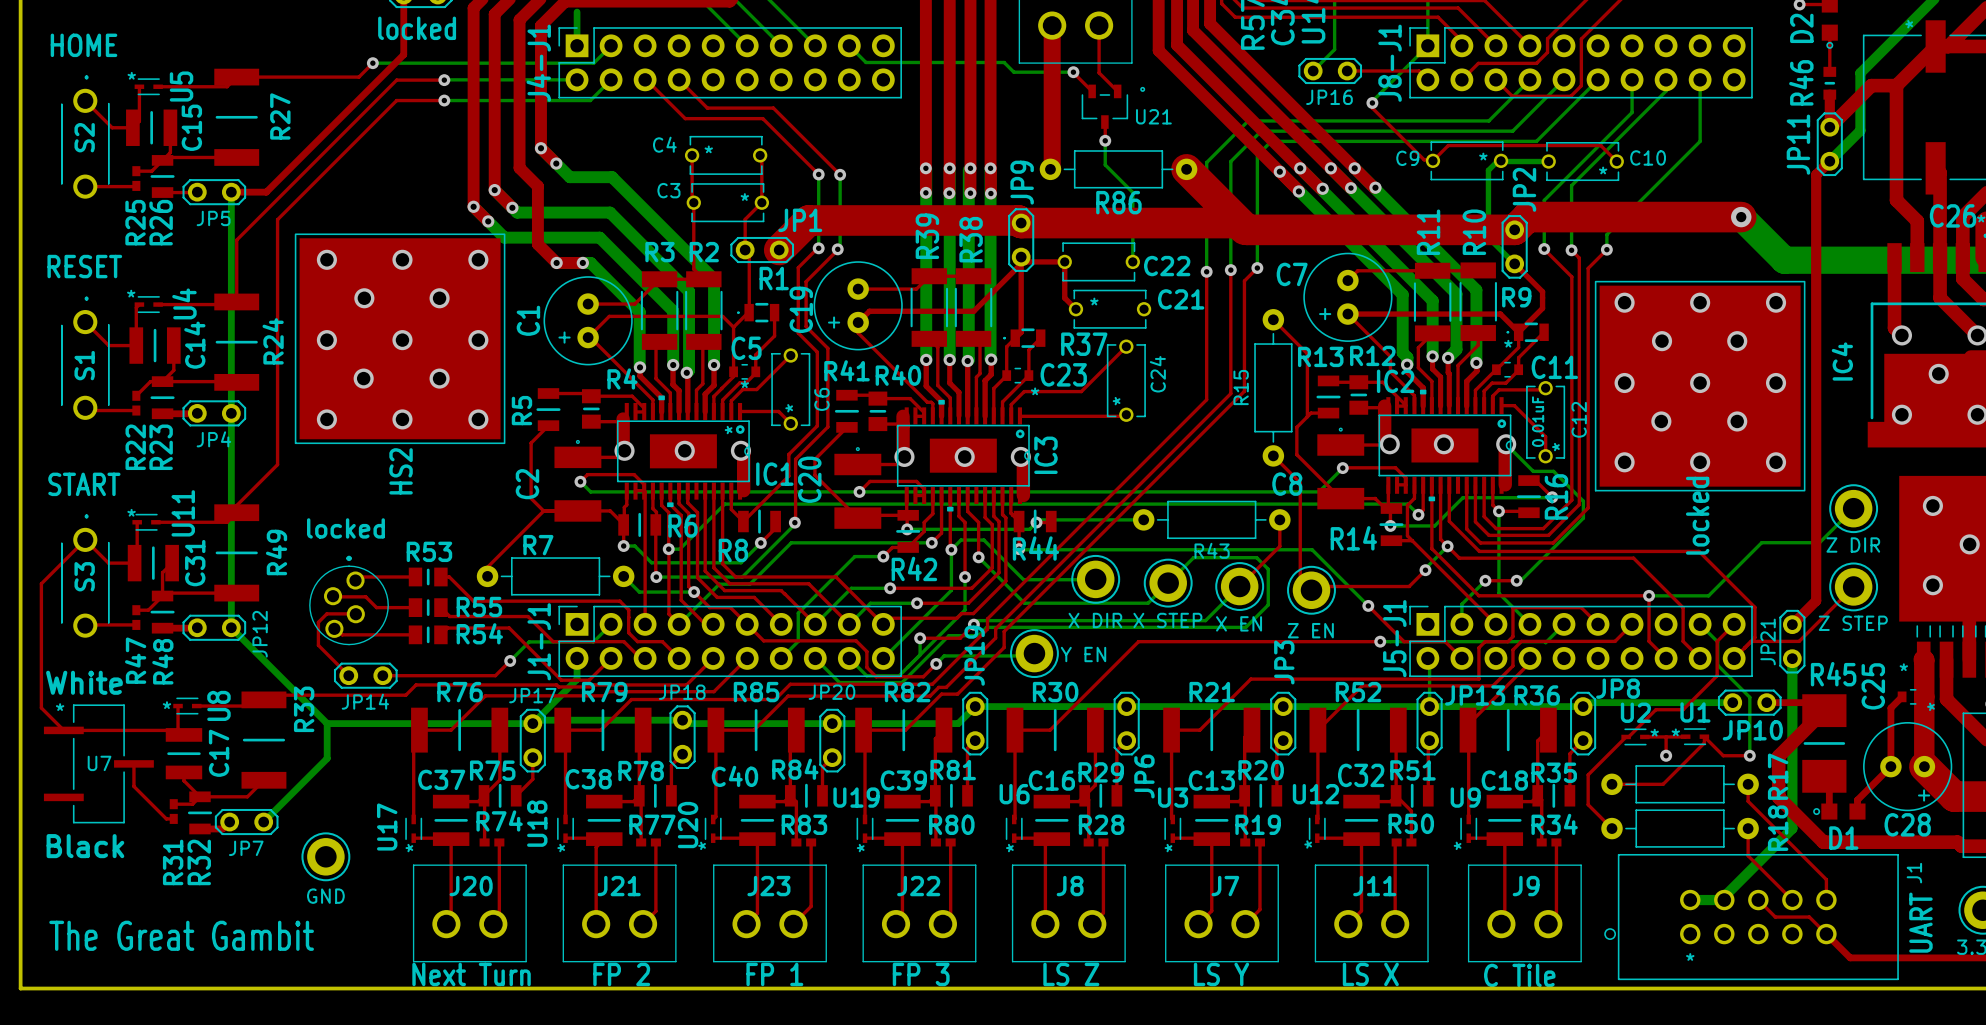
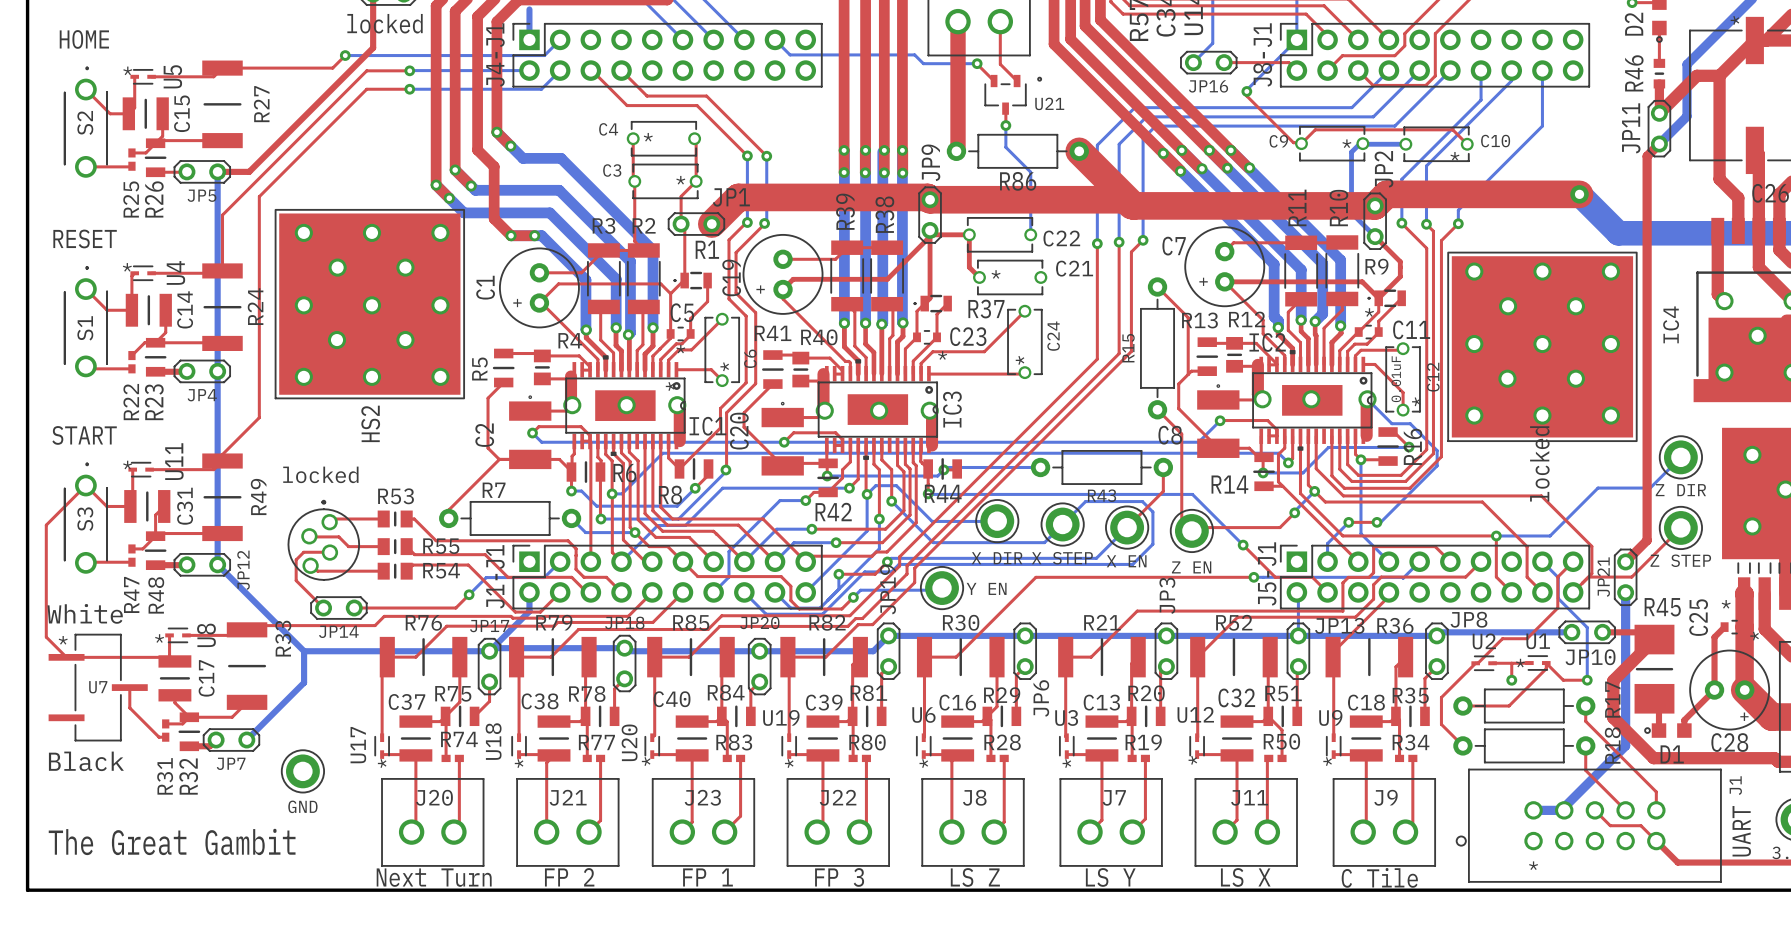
U2 text: * (1654, 732) -> none

